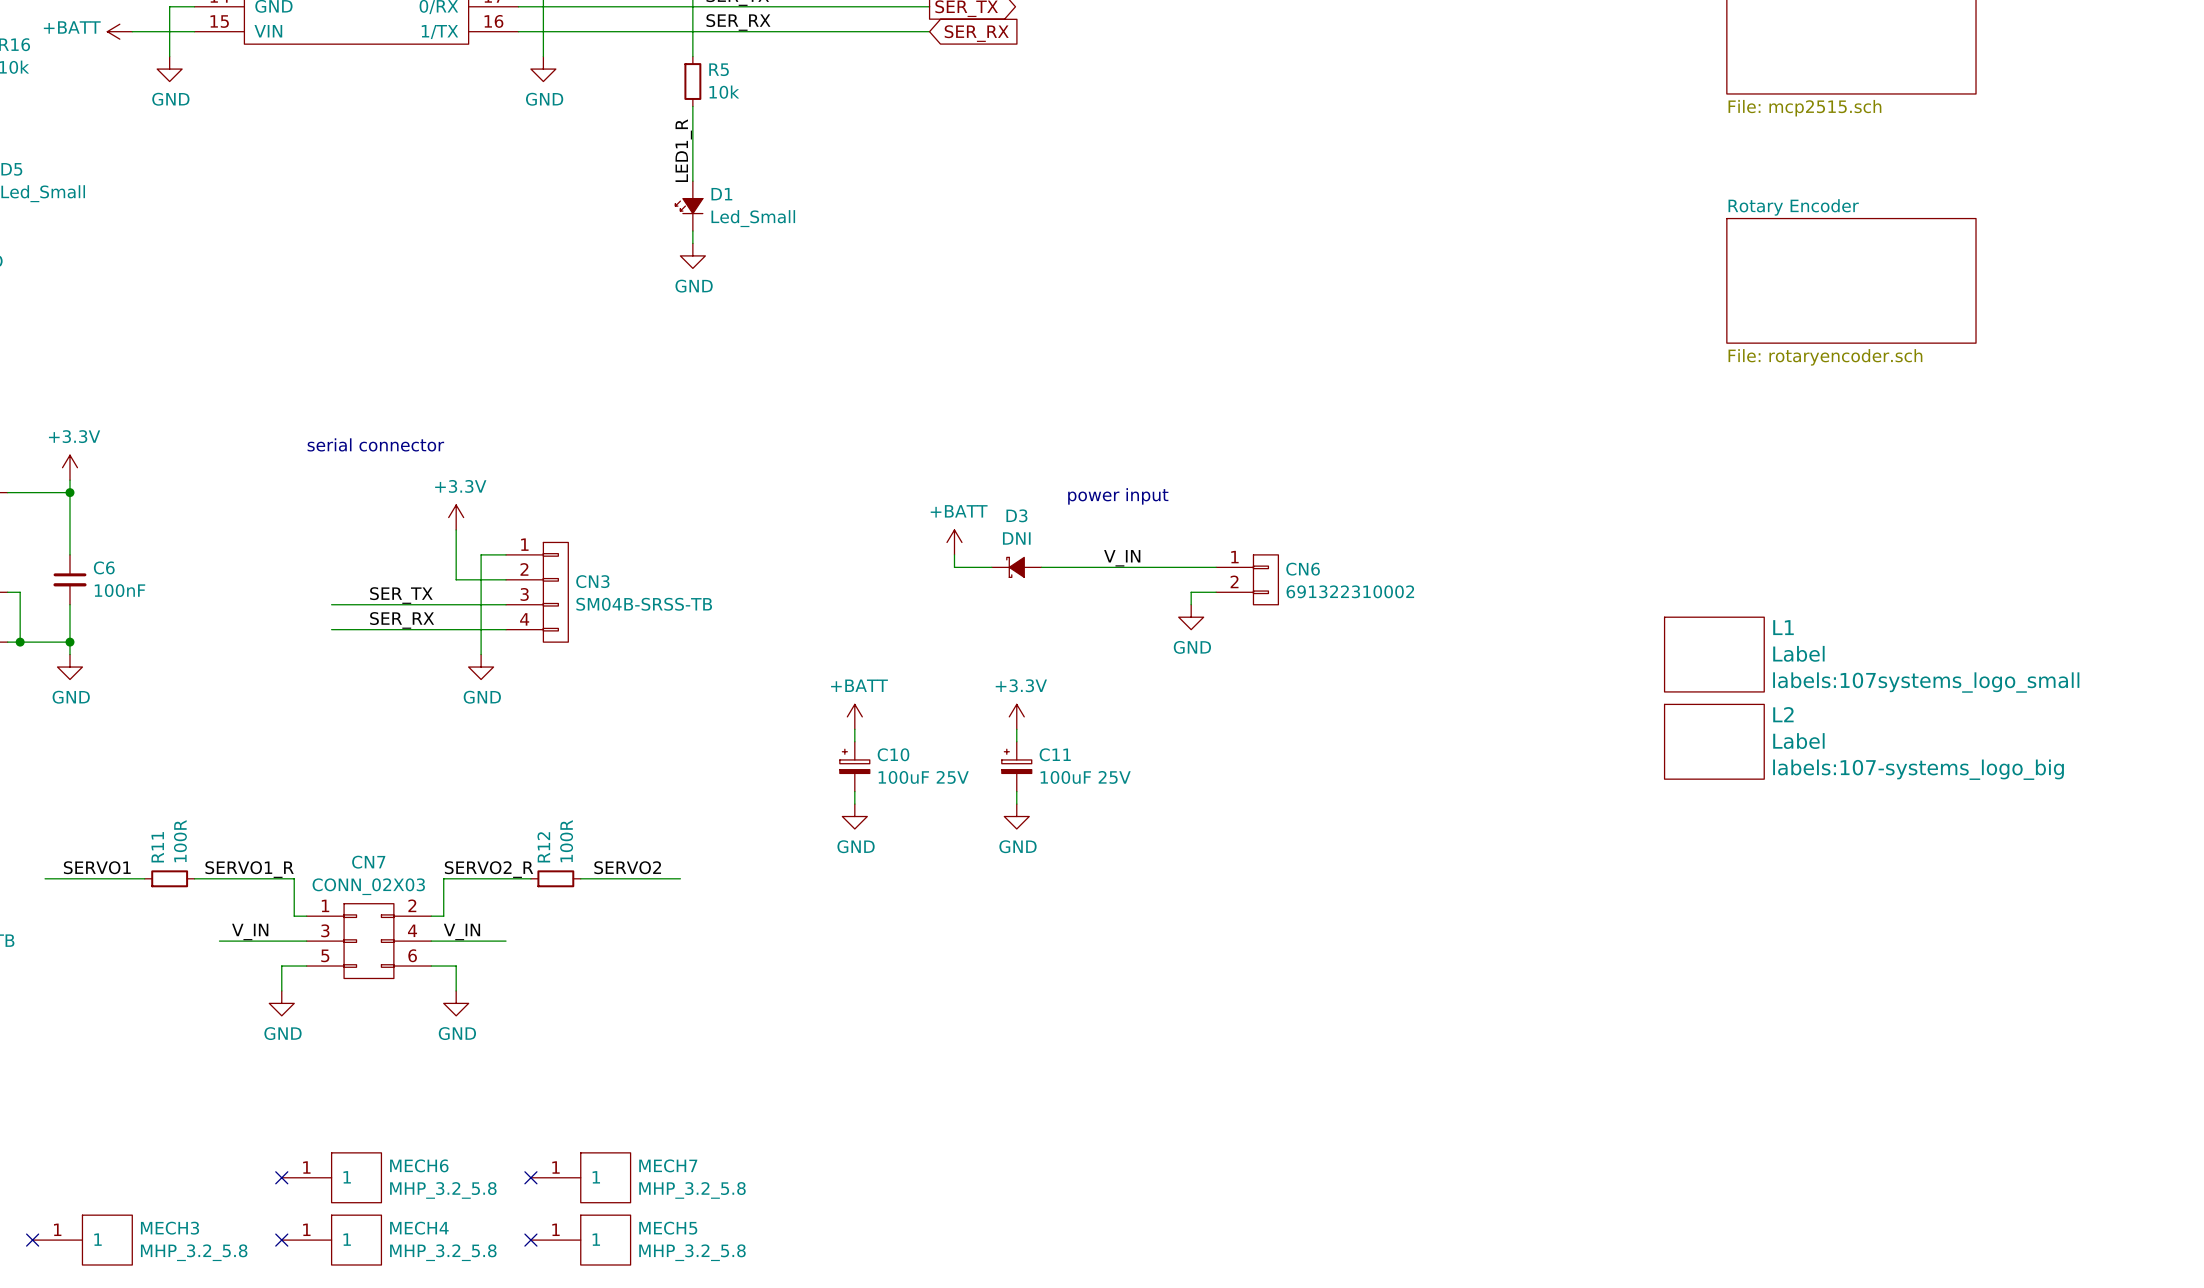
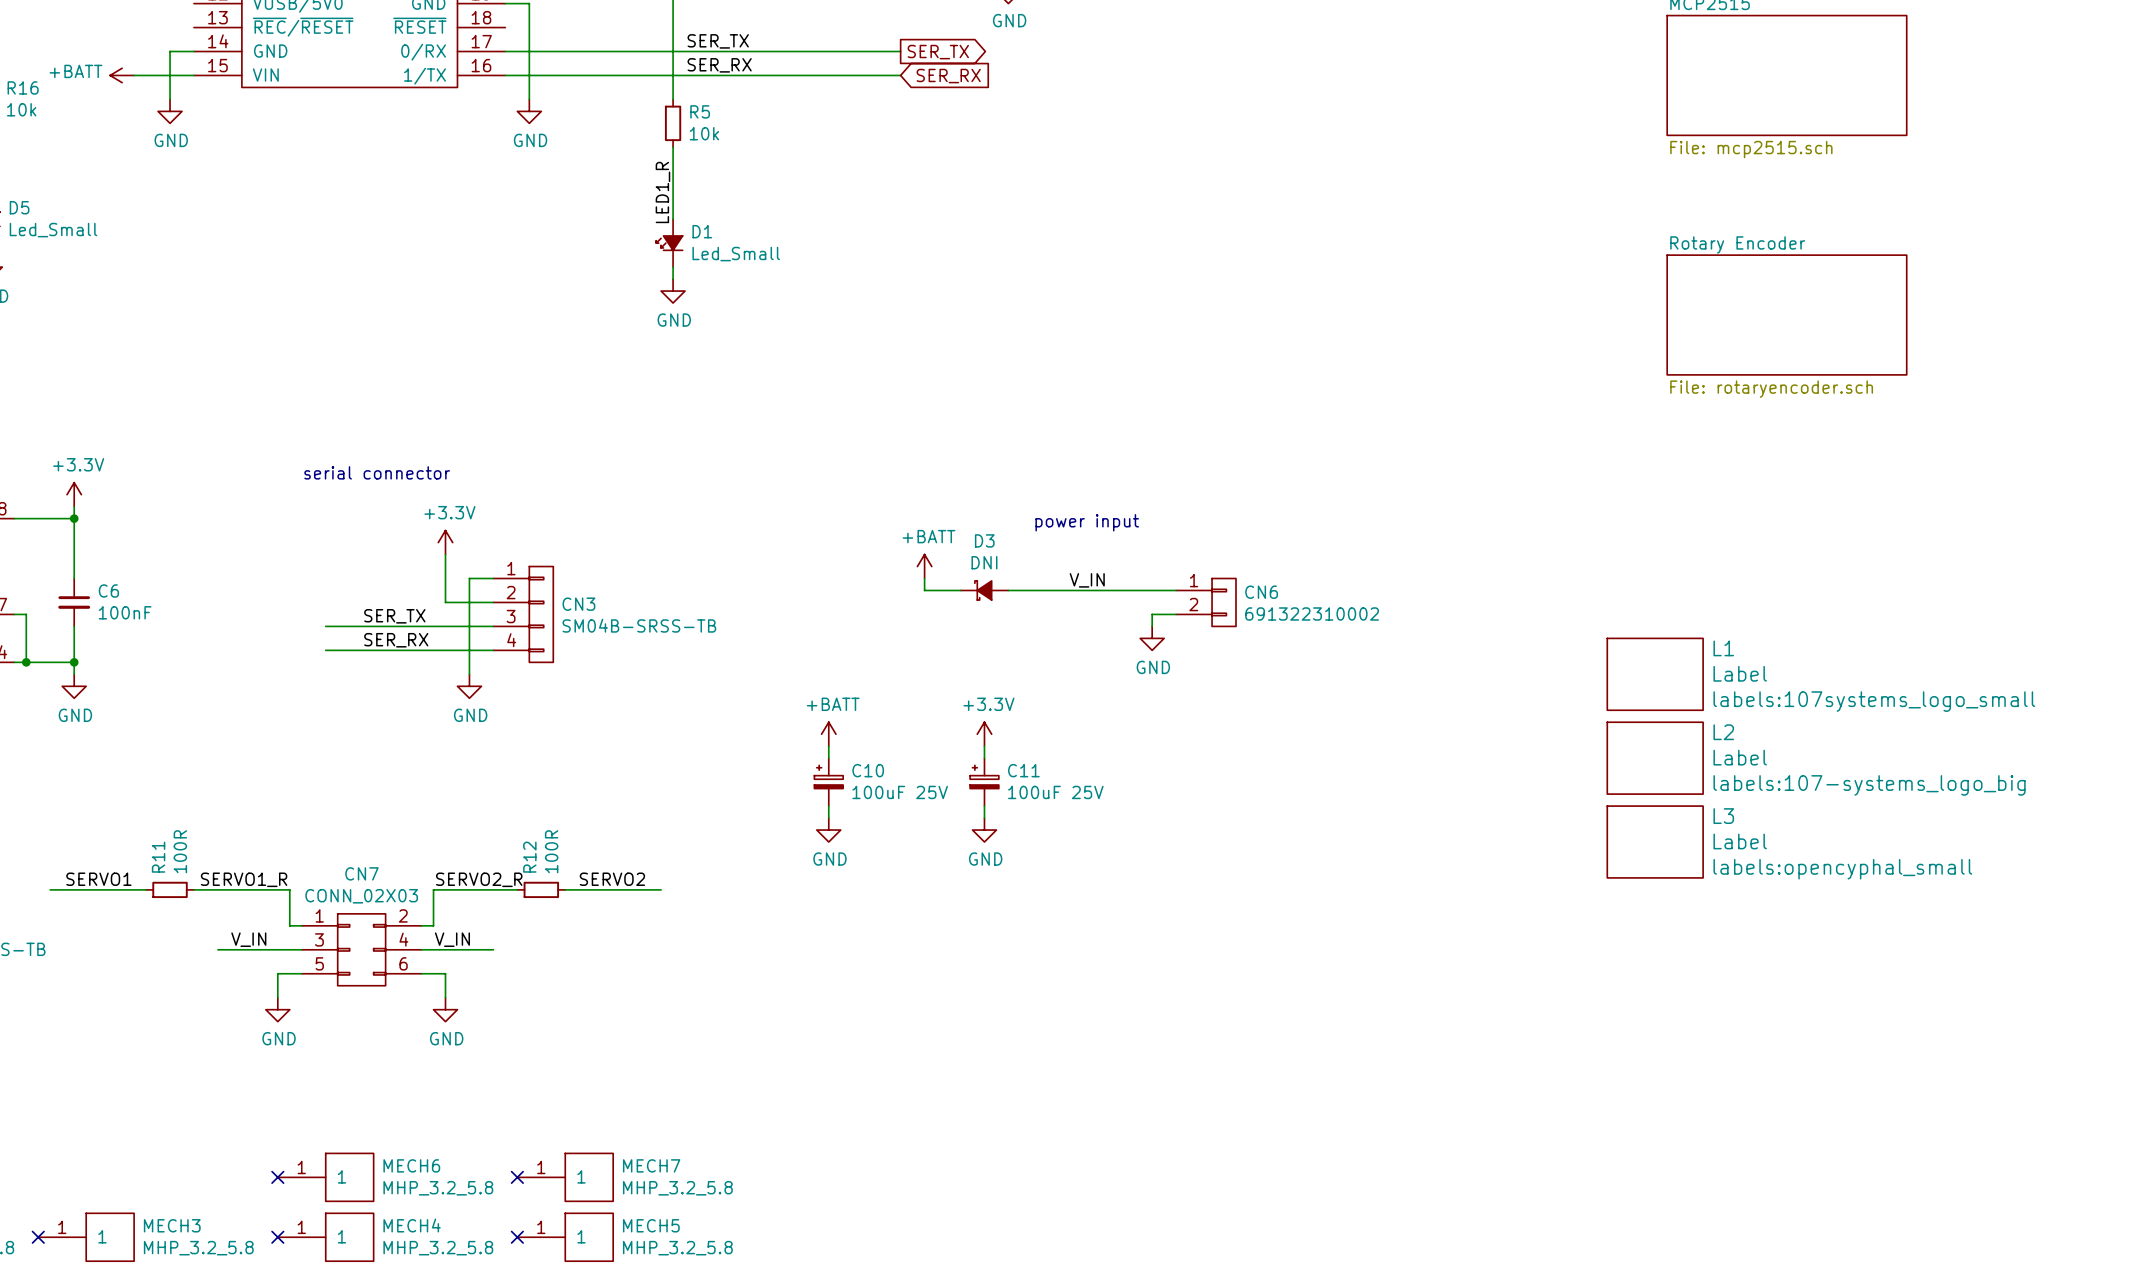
L3: none -> Label (1655, 842)

